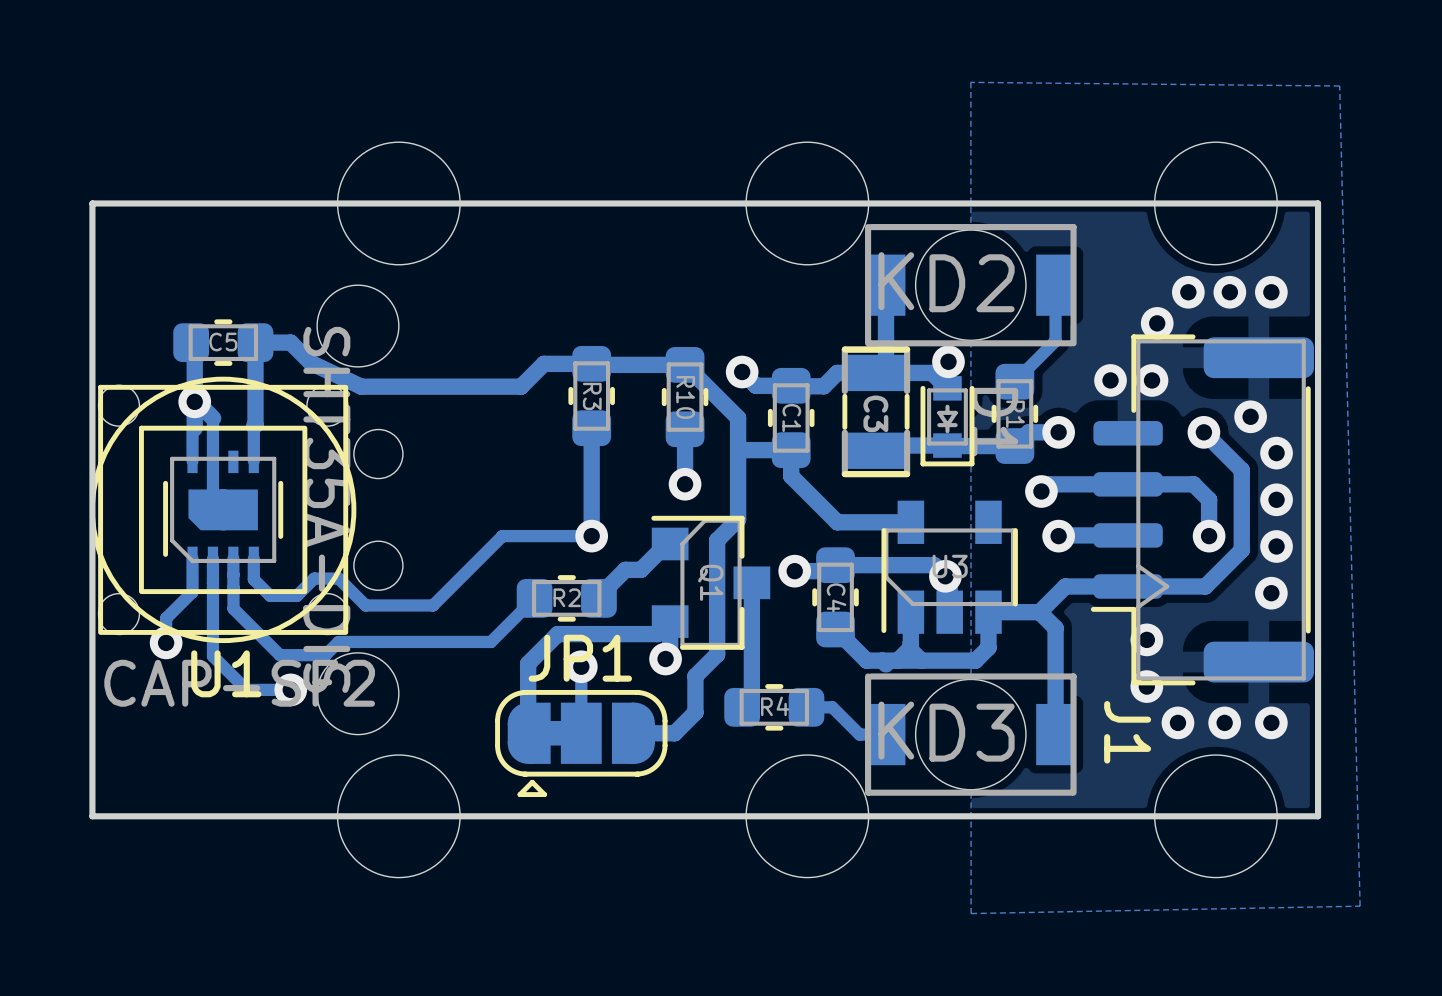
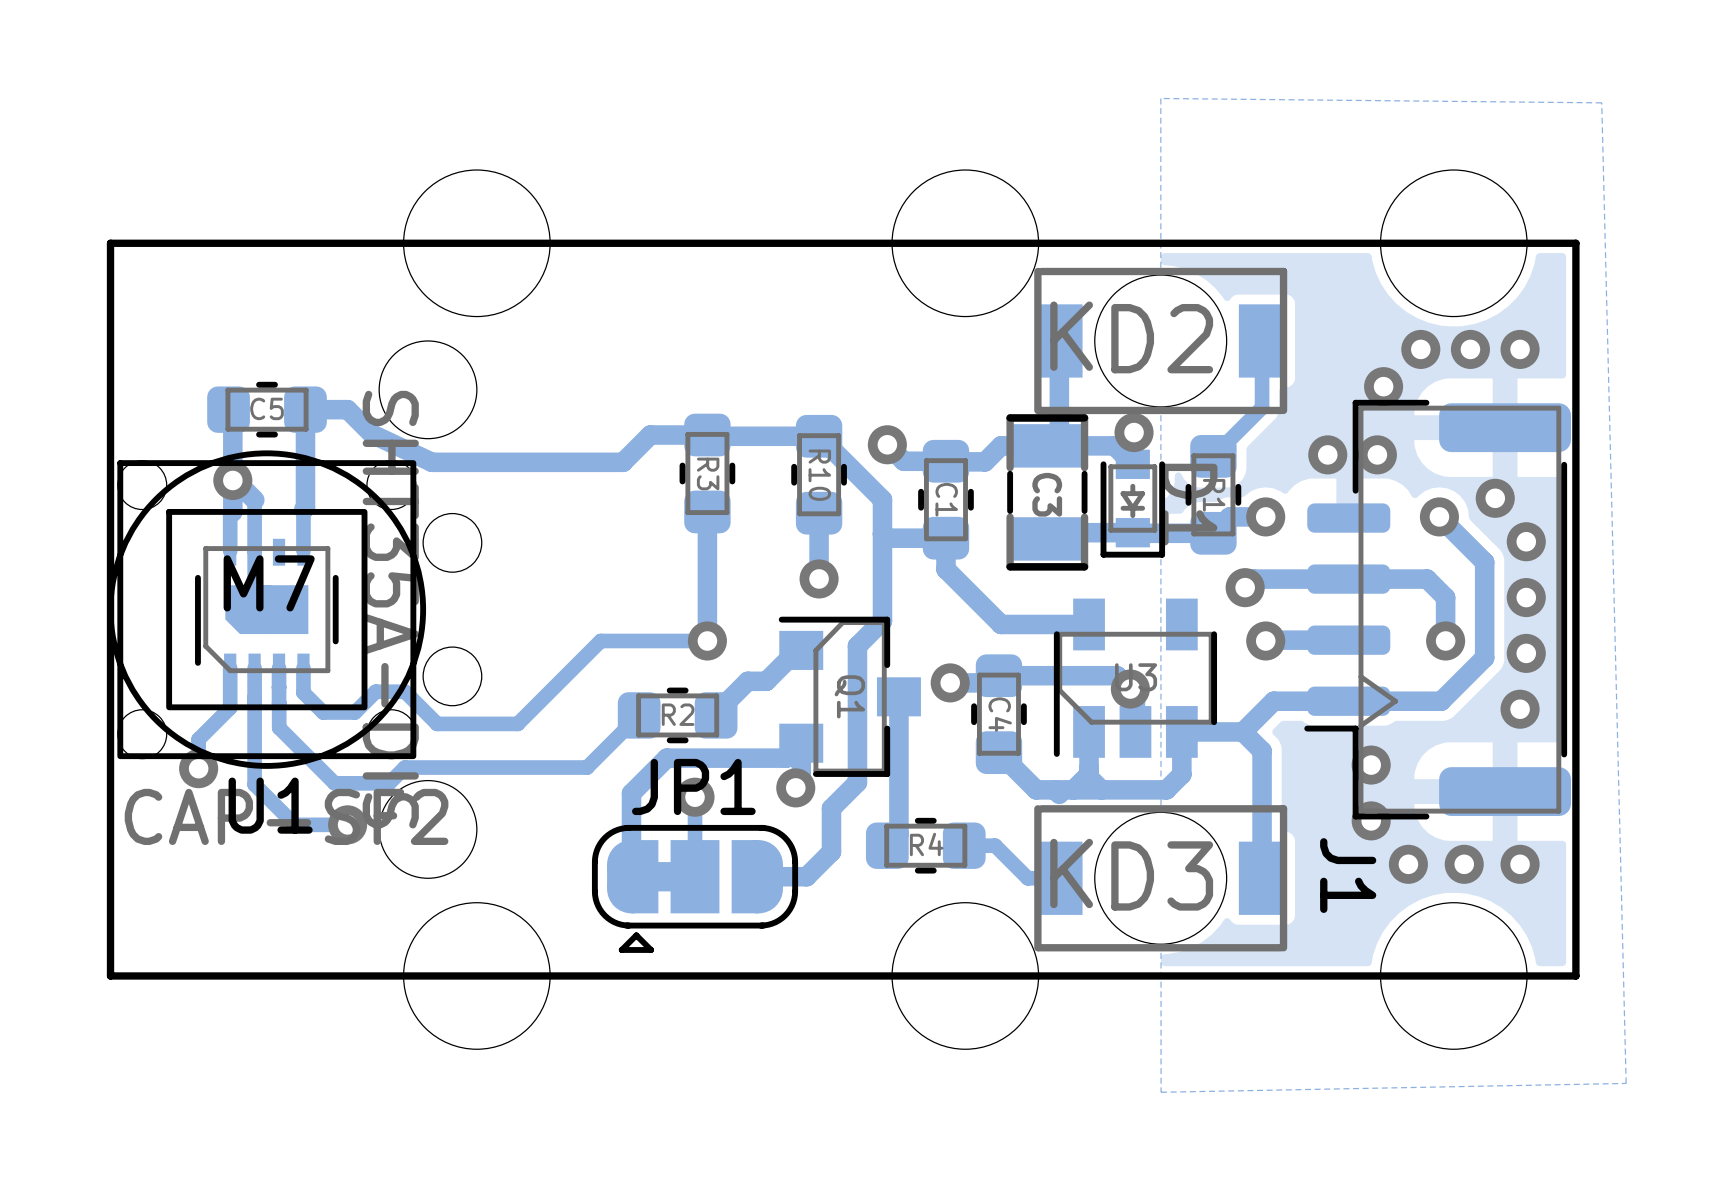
M7 name: none -> M7 (269, 583)

